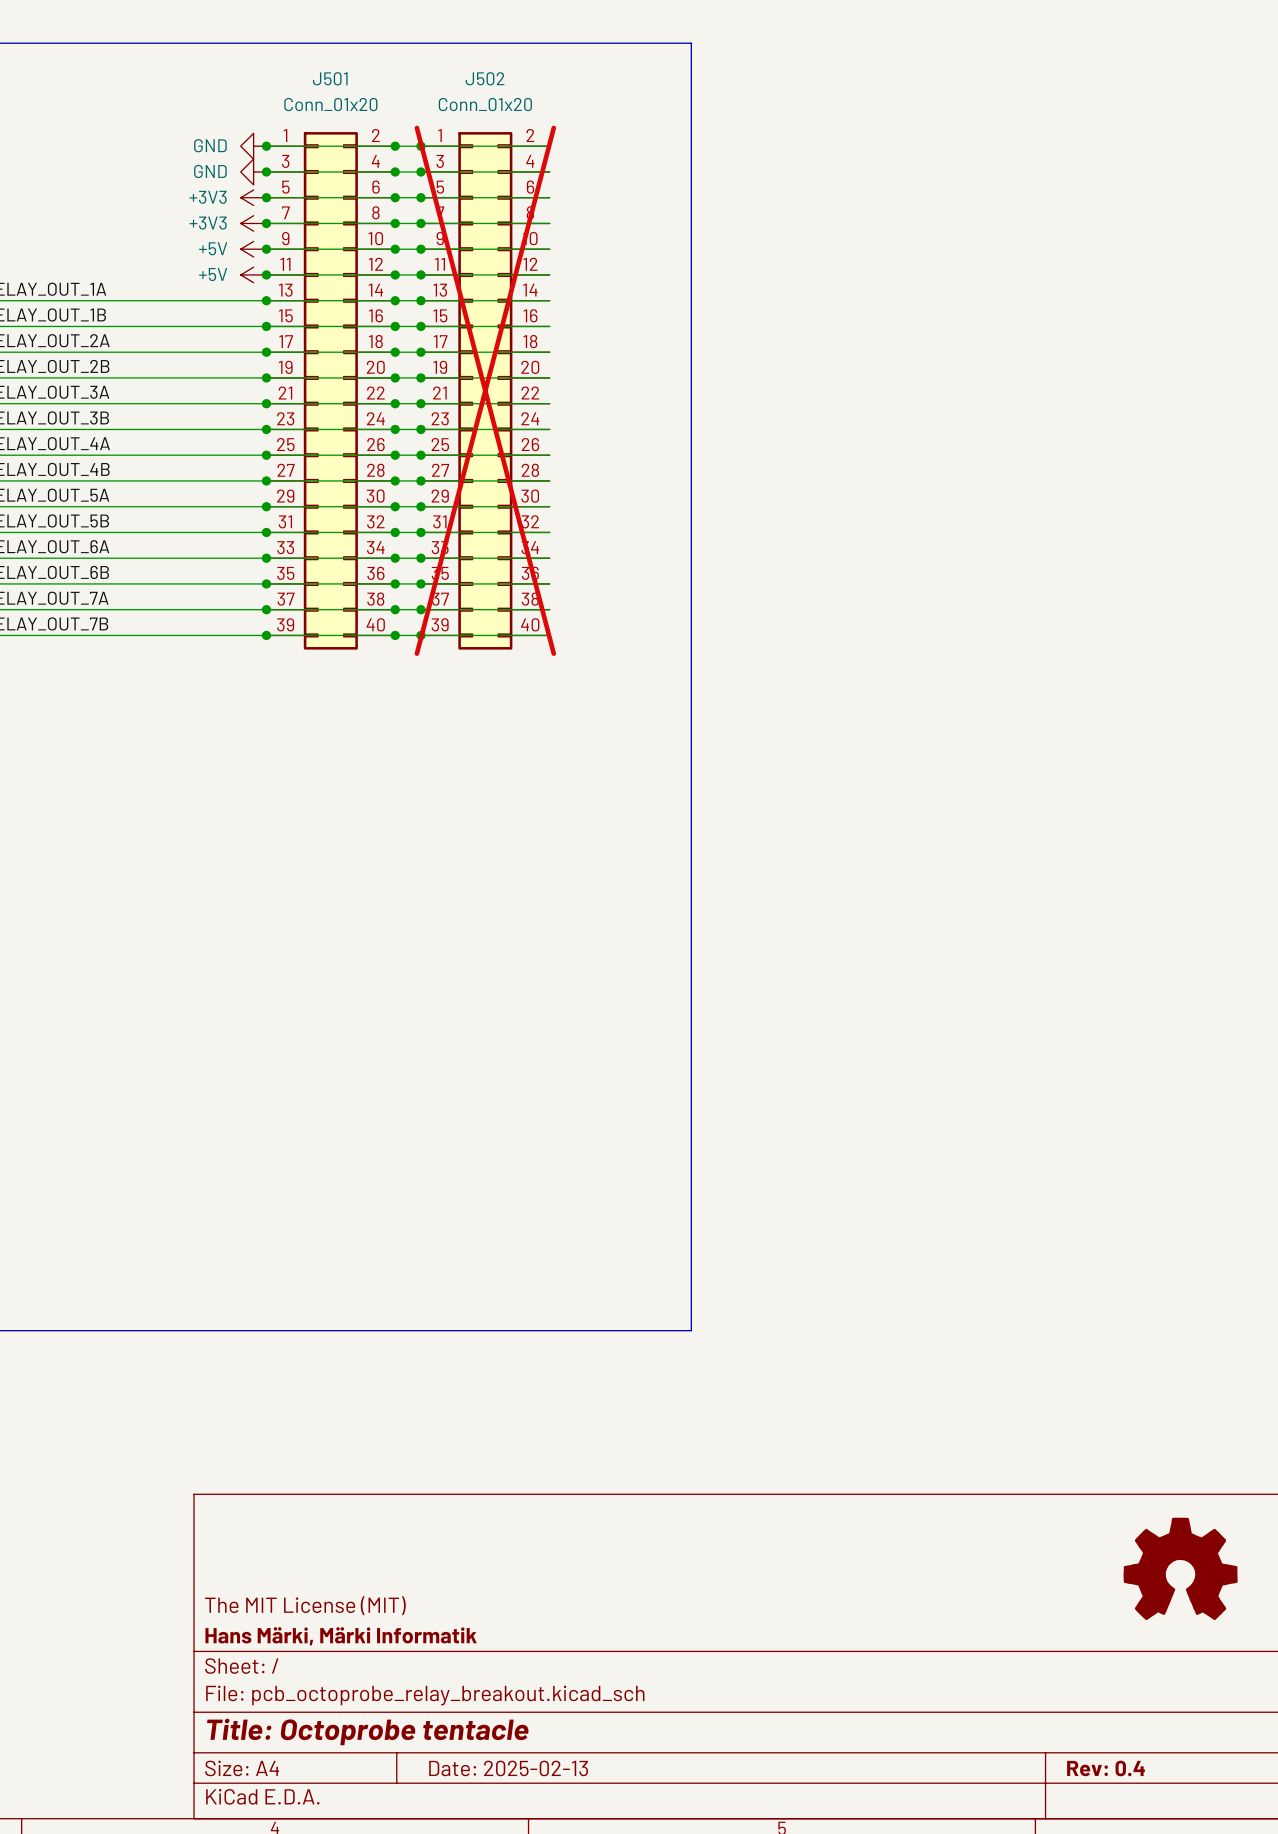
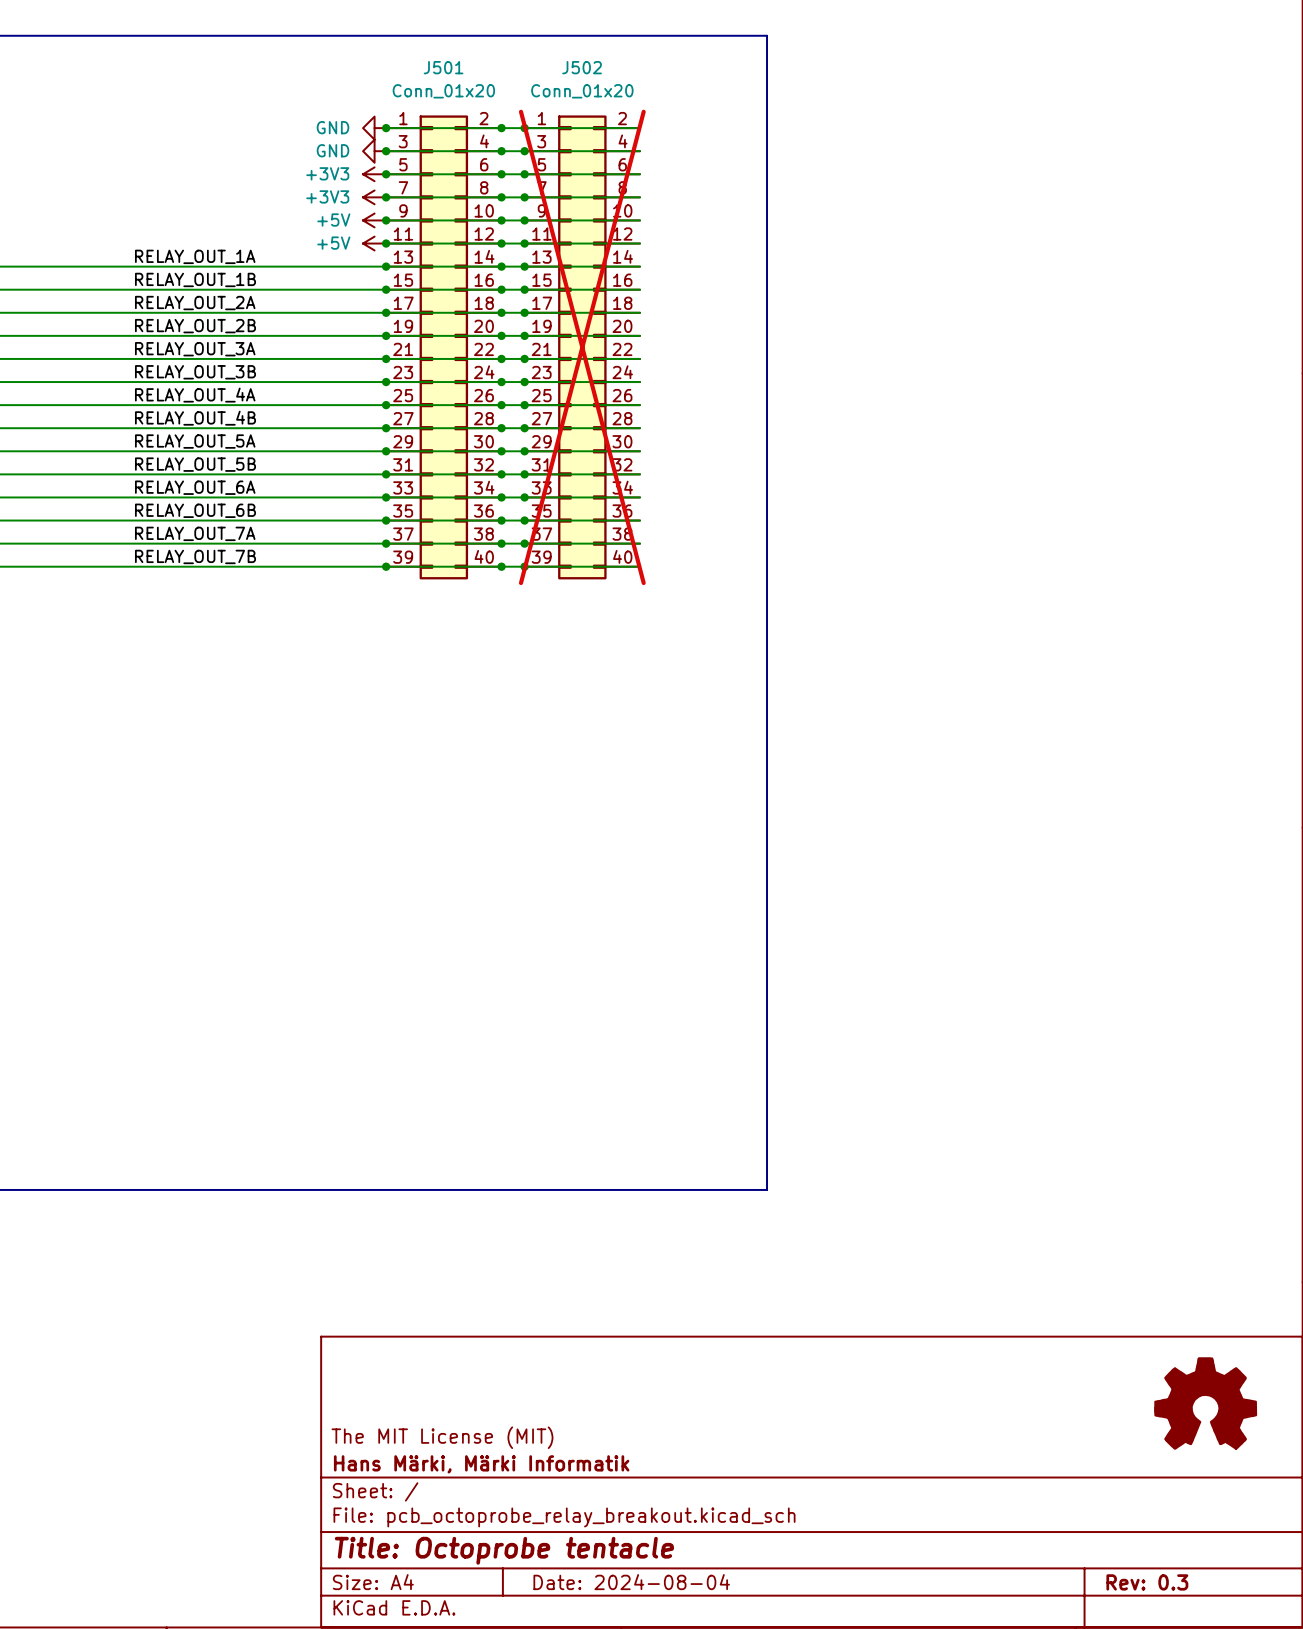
title block: Date: 2025-02-13 (508, 1768) -> Date: 2024-08-04 (631, 1582)
title block: Rev: 0.4 (1106, 1768) -> Rev: 0.3 (1147, 1582)

